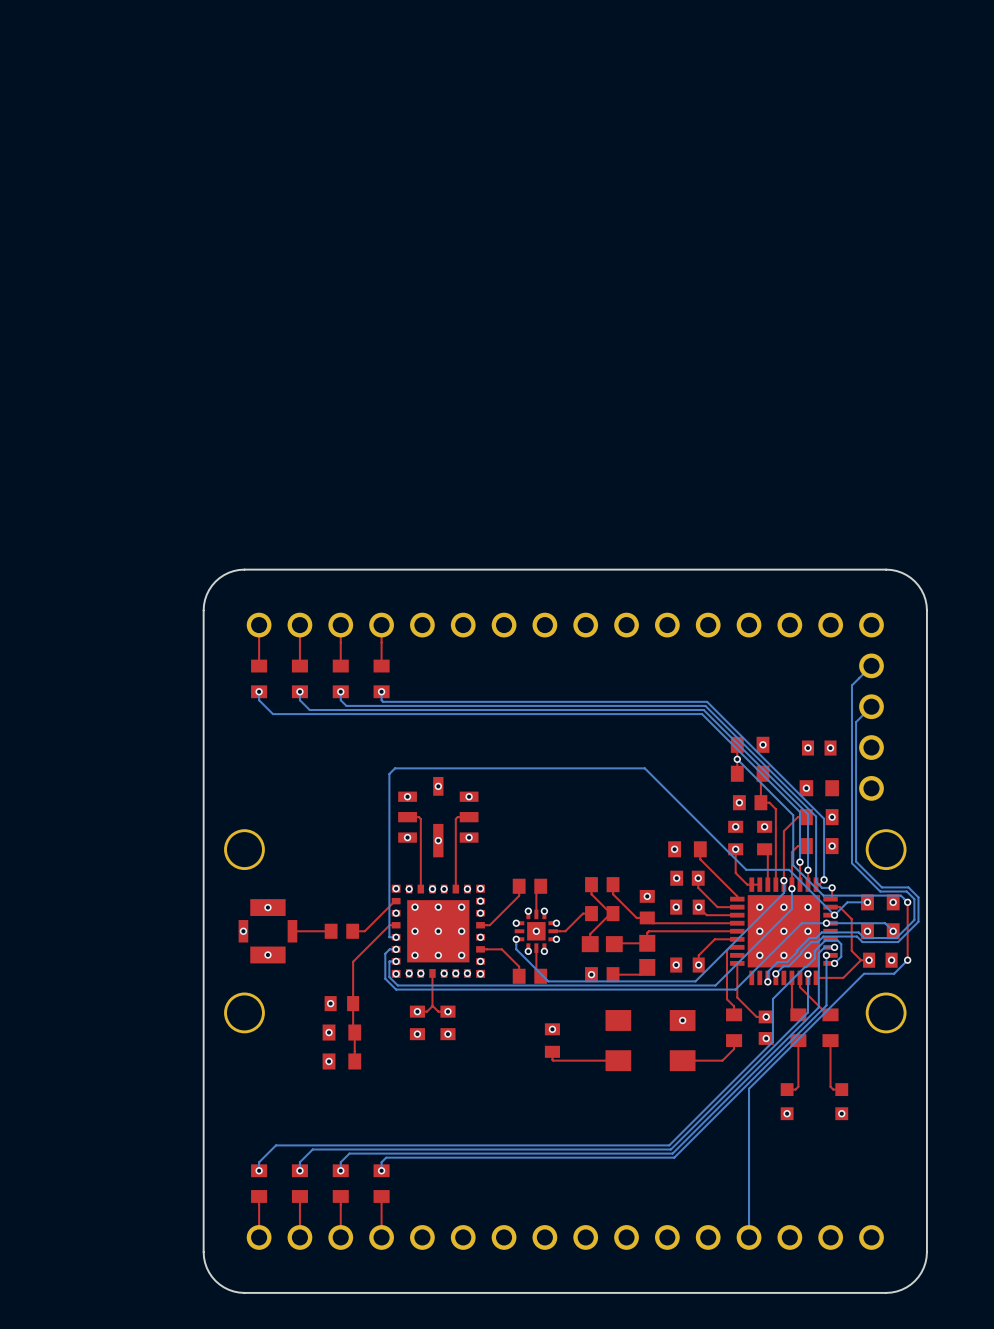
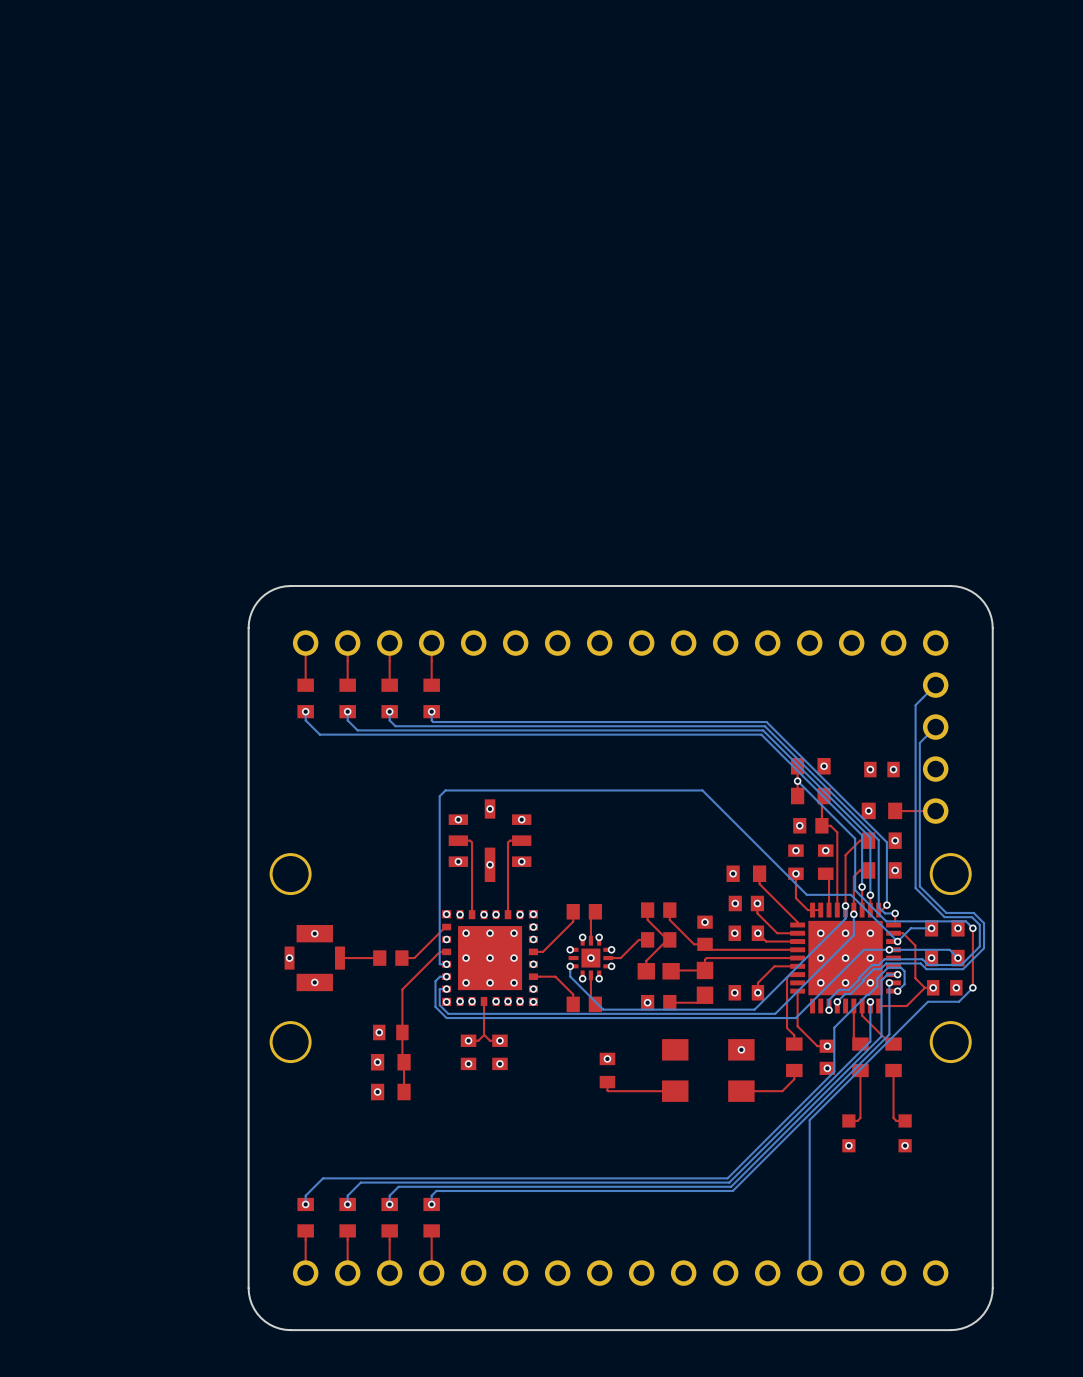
top track: none -> (935, 811) (895, 811)

